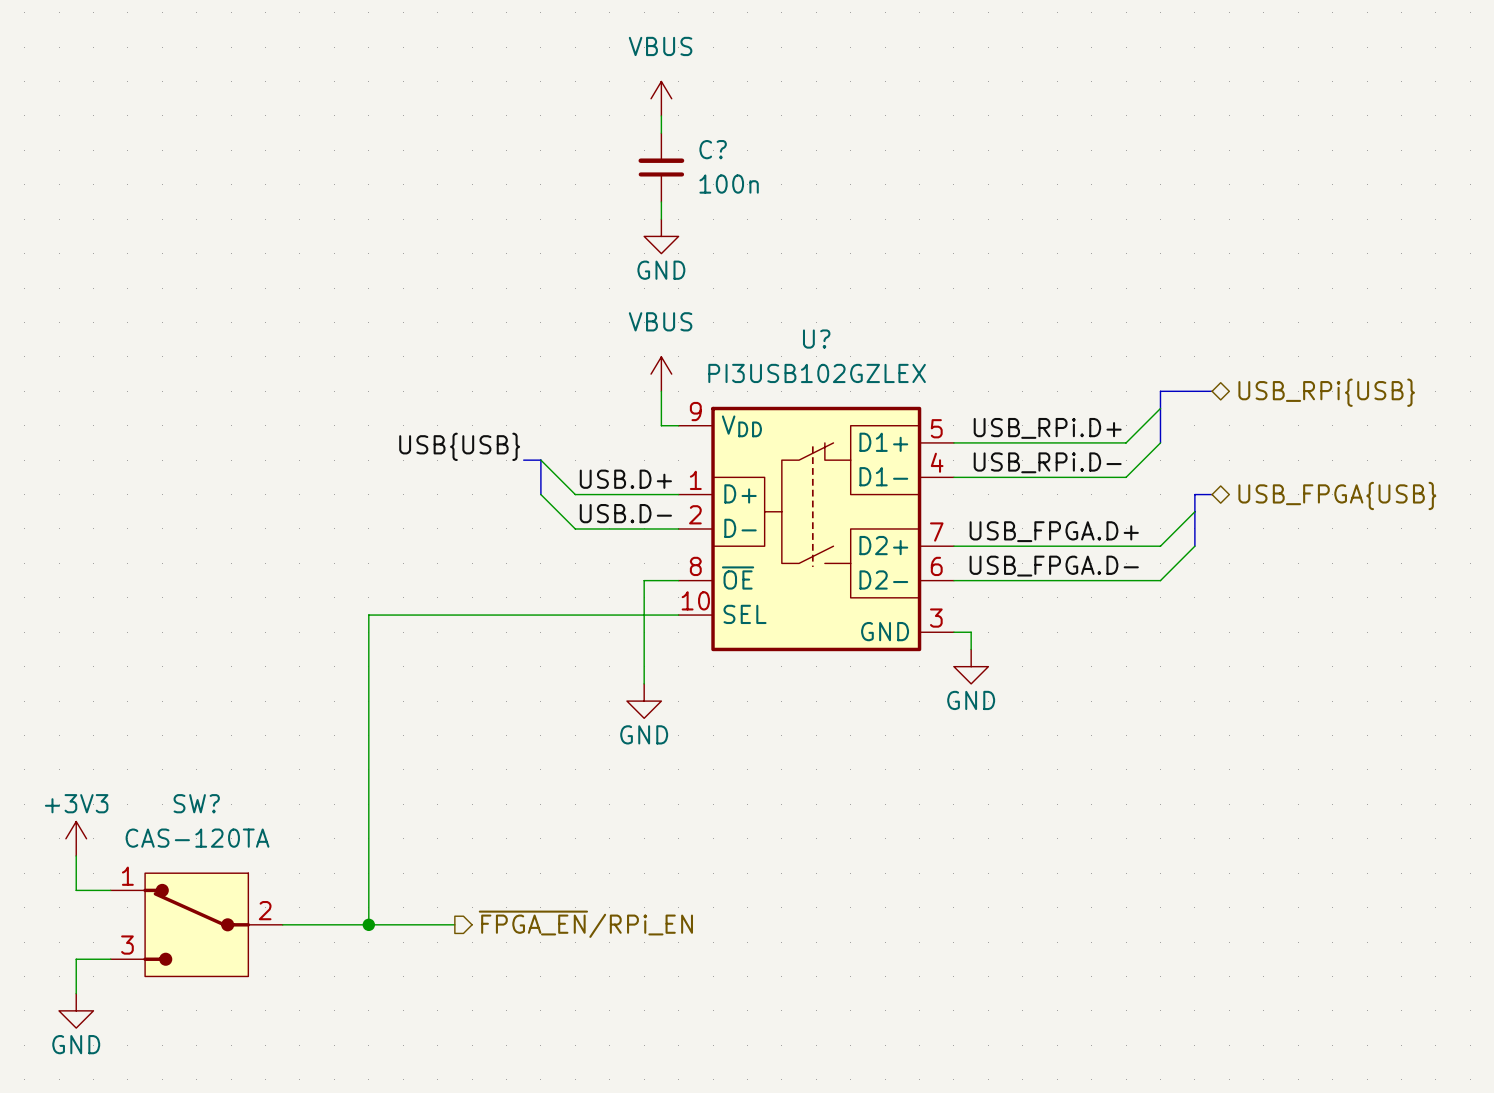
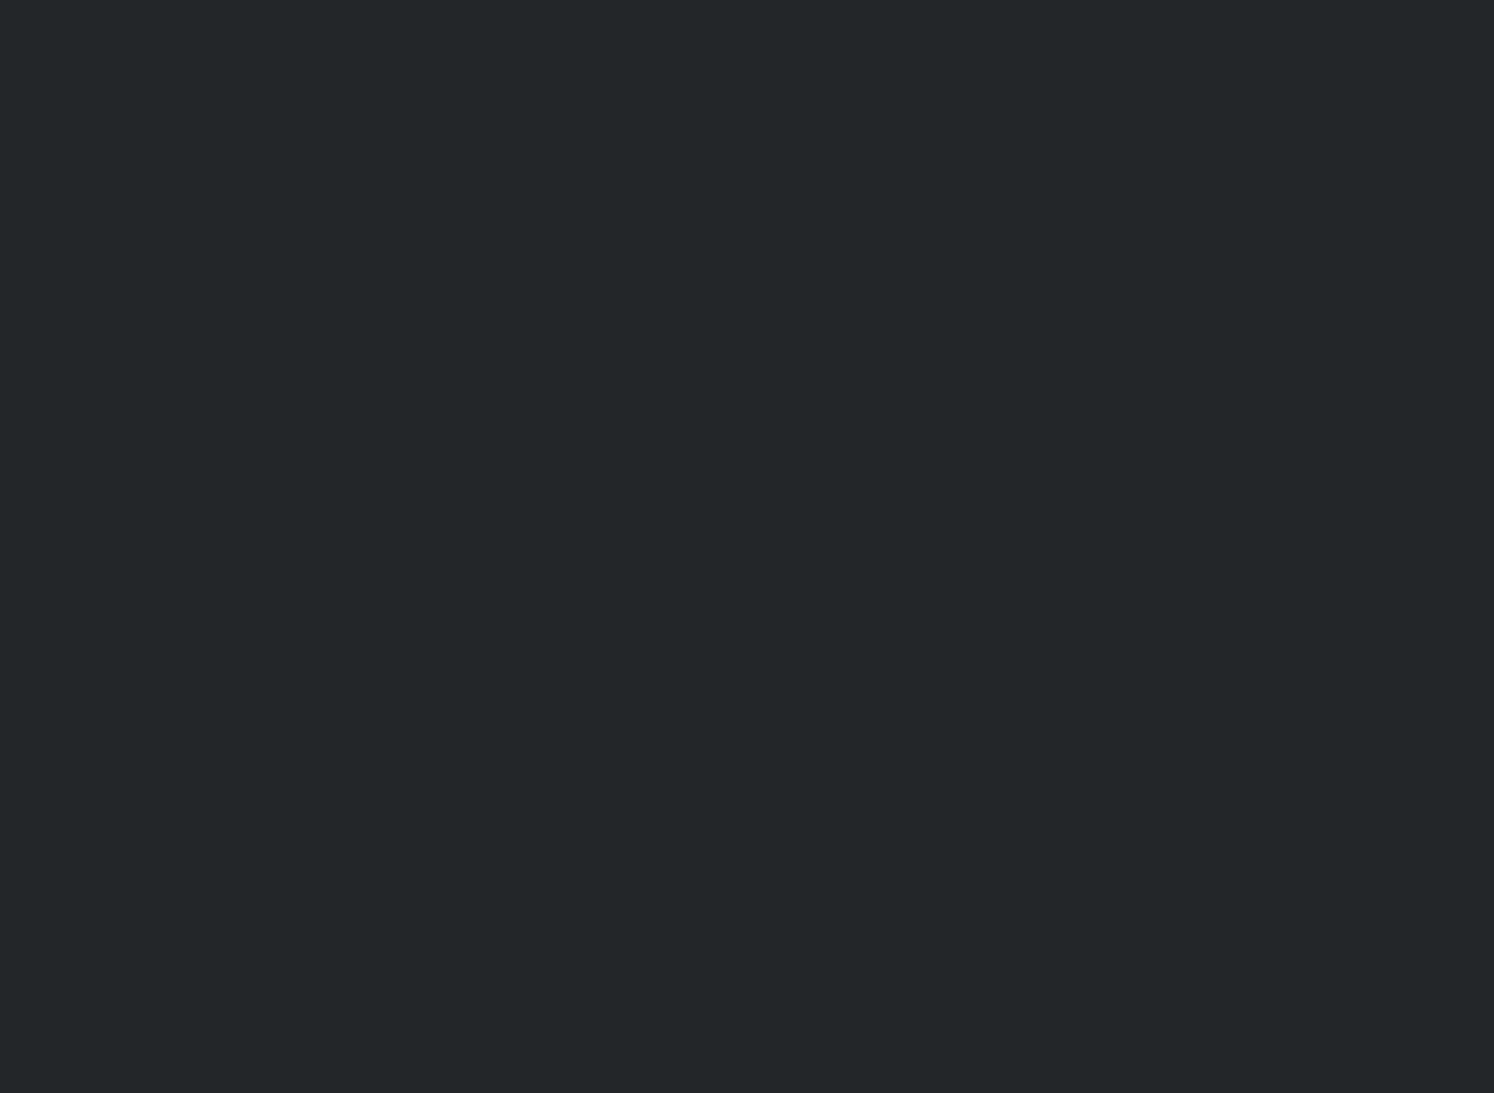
power symbol: VBUS (661, 98) -> none
wire: (661, 115) (661, 133) -> none
C?: (661, 167) -> none
wire: (661, 202) (661, 219) -> none
power symbol: GND (661, 236) -> none
power symbol: VBUS (661, 374) -> none
wire: (661, 391) (661, 425) (678, 425) -> none
bus: (1212, 391) (1160, 391) (1160, 442) -> none
hierarchical label: USB_RPi{USB} (1326, 392) -> none
wire: (1160, 408) (1126, 442) (953, 442) -> none
label: USB_RPi.D+ (1047, 428) -> none
wire: (1160, 442) (1126, 477) (953, 477) -> none
label: USB{USB} (459, 446) -> none
bus: (523, 460) (540, 460) (540, 494) -> none
wire: (540, 460) (575, 494) (678, 494) -> none
label: USB_RPi.D- (1047, 462) -> none
label: USB.D+ (625, 479) -> none
wire: (540, 494) (575, 528) (678, 528) -> none
bus: (1212, 494) (1194, 494) (1194, 546) -> none
hierarchical label: USB_FPGA{USB} (1337, 495) -> none
wire: (1194, 511) (1160, 546) (953, 546) -> none
label: USB.D- (625, 513) -> none
U?: (816, 528) -> none
label: USB_FPGA.D+ (1054, 531) -> none
wire: (1194, 546) (1160, 580) (953, 580) -> none
label: USB_FPGA.D- (1054, 566) -> none
wire: (678, 580) (644, 580) (644, 683) -> none
wire: (678, 615) (368, 615) (368, 924) -> none
wire: (953, 632) (971, 632) (971, 649) -> none
power symbol: GND (971, 666) -> none
power symbol: GND (644, 701) -> none
power symbol: +3V3 (76, 838) -> none
wire: (76, 855) (76, 890) (110, 890) -> none
SW?: (196, 924) -> none
wire: (282, 924) (454, 924) -> none
junction: (368, 924) -> none
hierarchical label: ~{FPGA_EN}/RPi_EN (585, 924) -> none
wire: (110, 959) (76, 959) (76, 993) -> none
power symbol: GND (76, 1010) -> none

